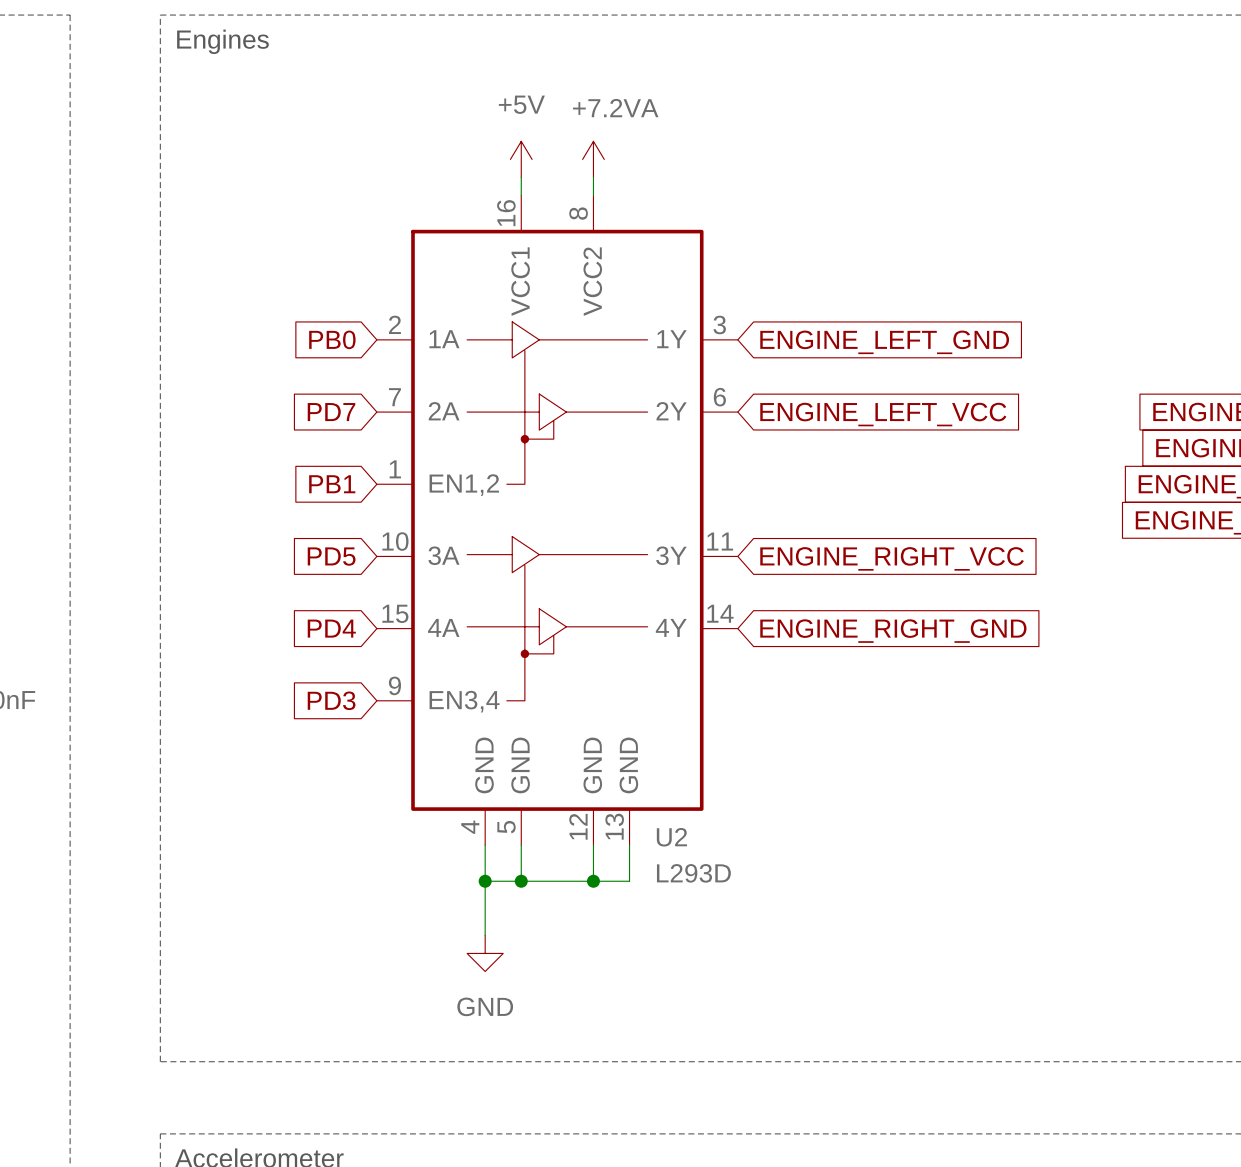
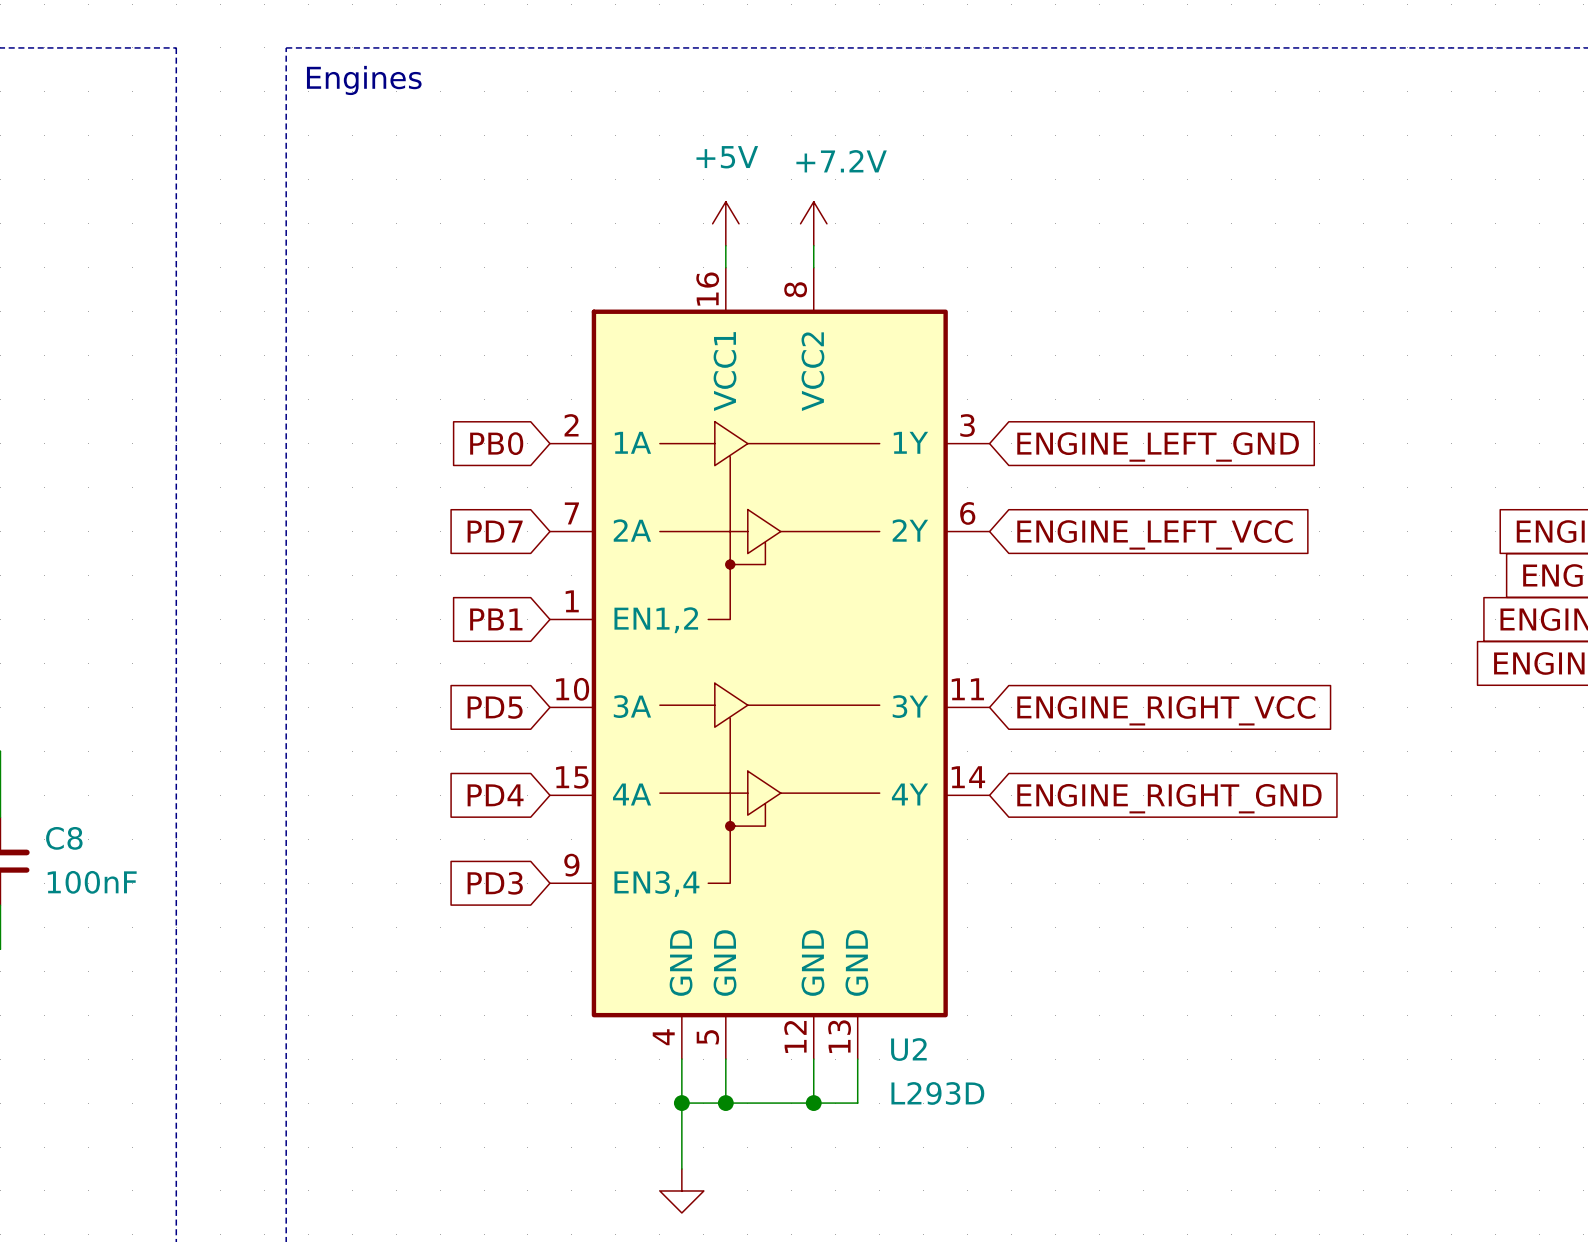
power symbol: +7.2VA (593, 159) -> +7.2V (813, 223)

